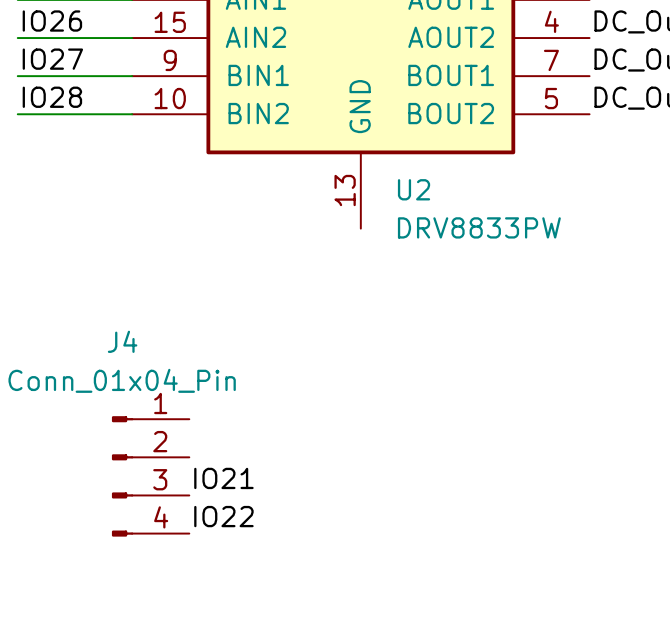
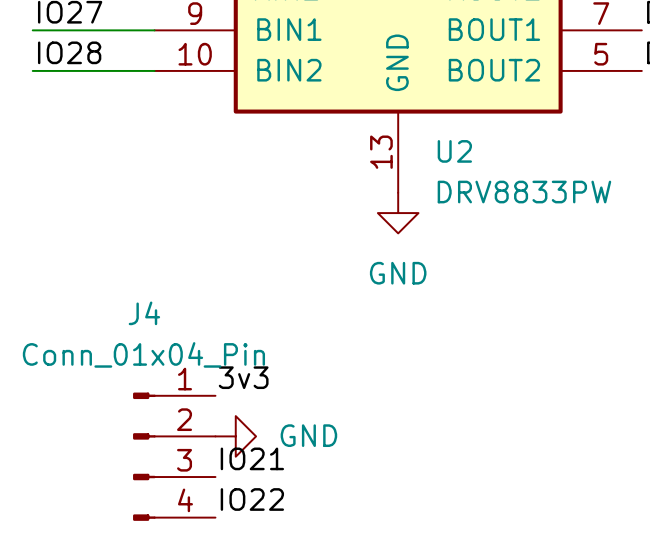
power symbol: none -> GND (398, 213)
label: none -> 3v3 (243, 377)
power symbol: none -> GND (235, 436)

